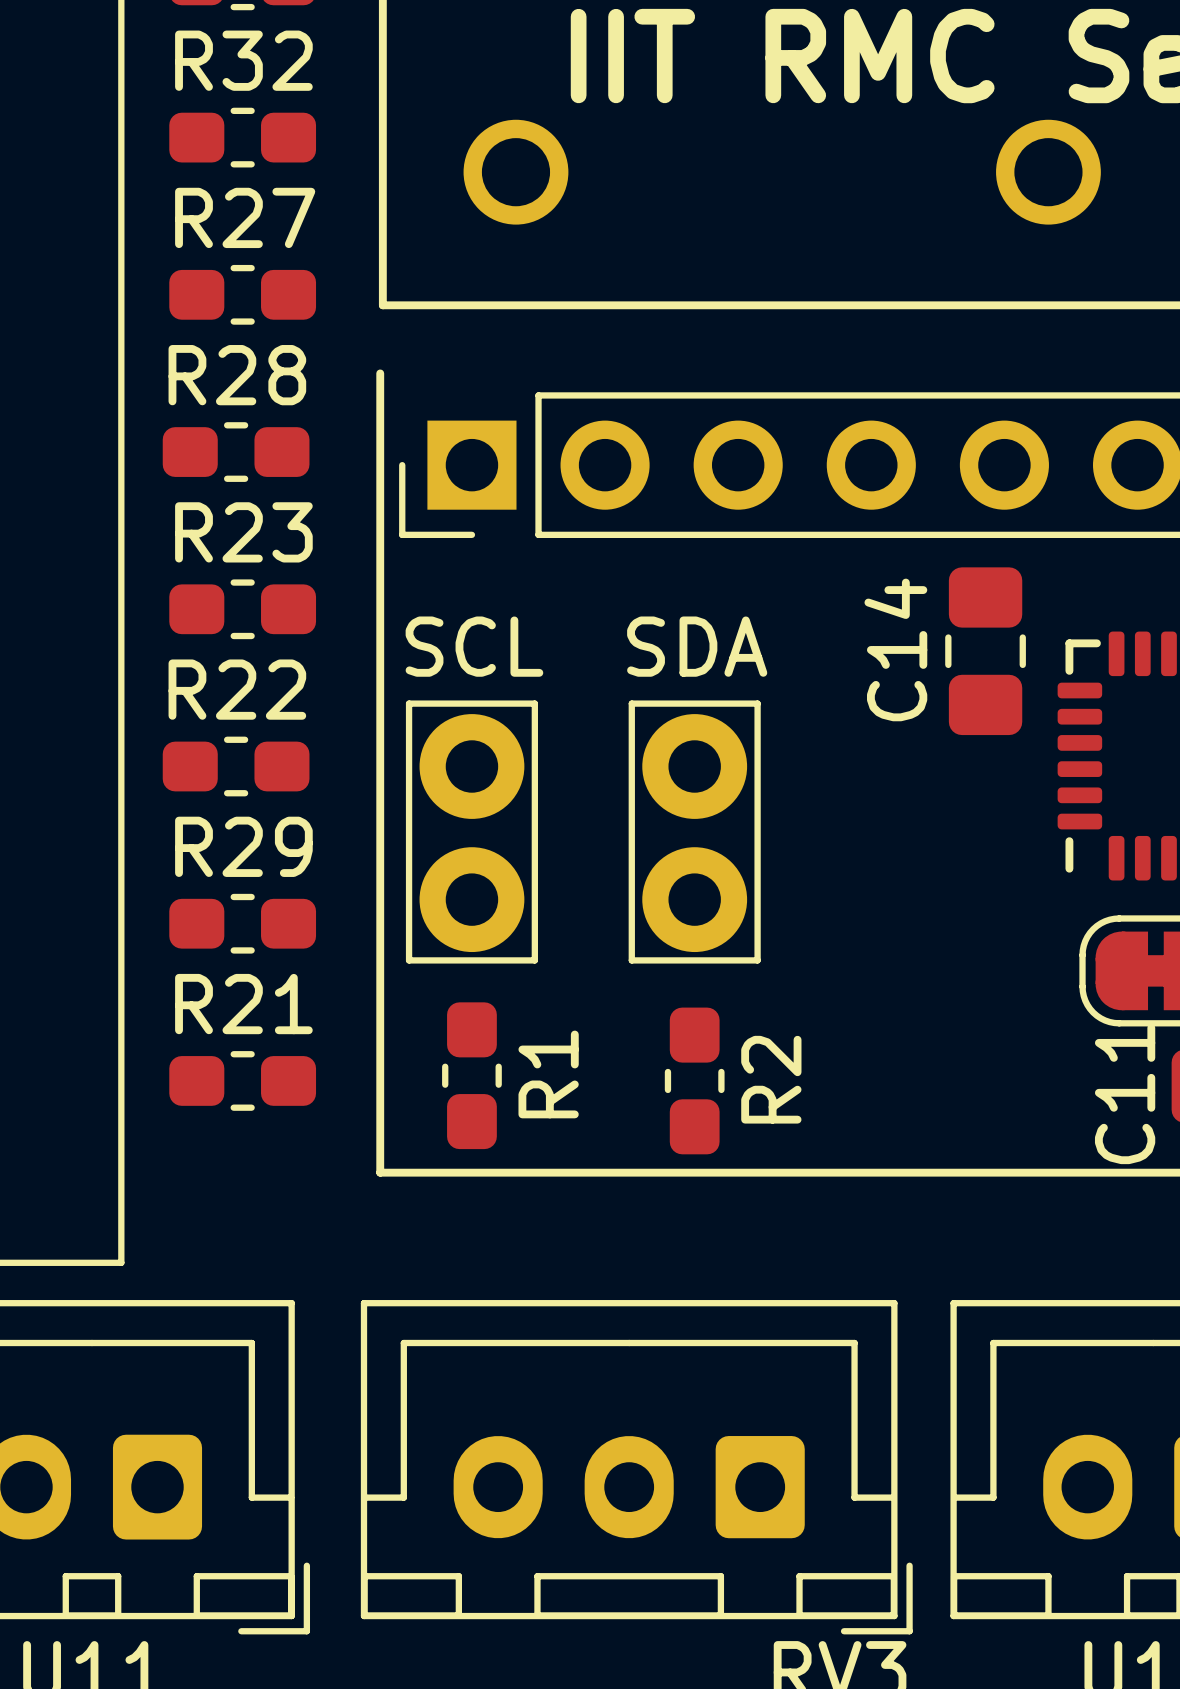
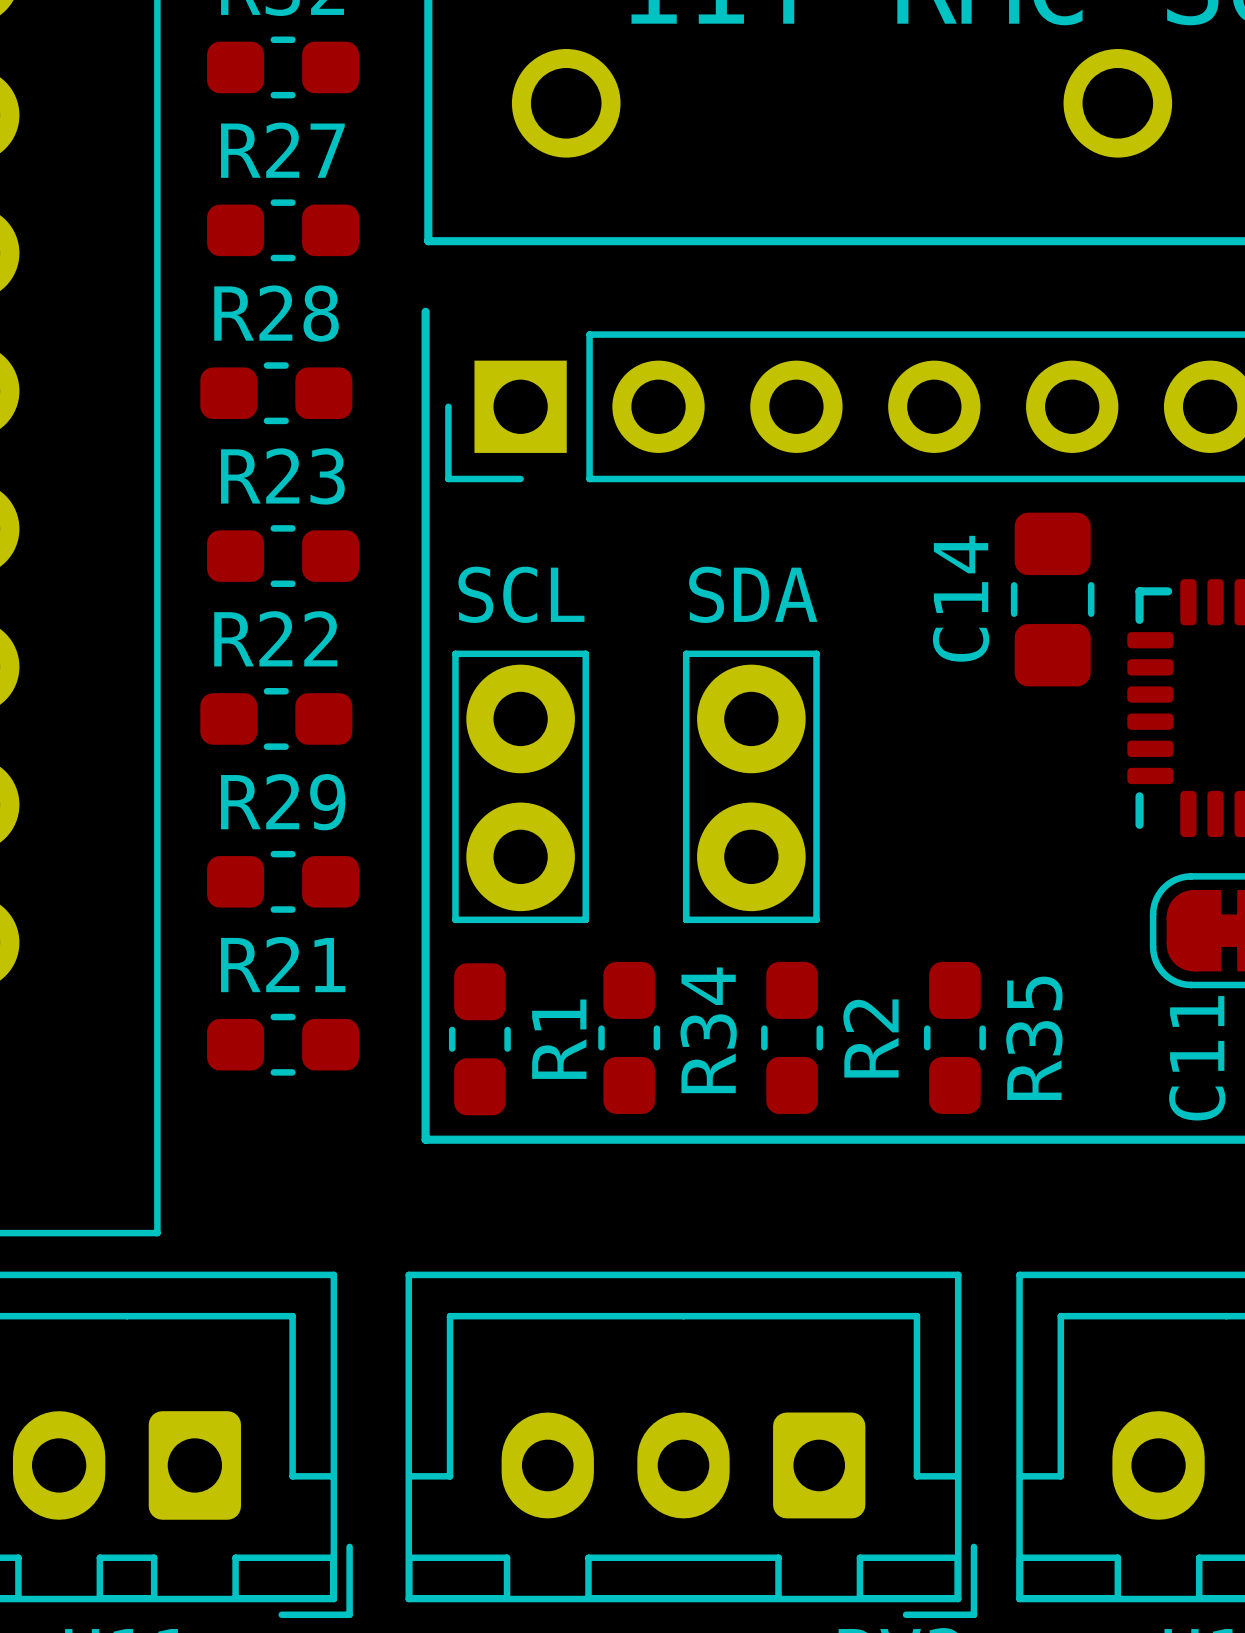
R34: none -> (629, 1037)
R35: none -> (954, 1037)
R1 position: (471, 1075) -> (479, 1039)
R2 position: (694, 1080) -> (792, 1037)

